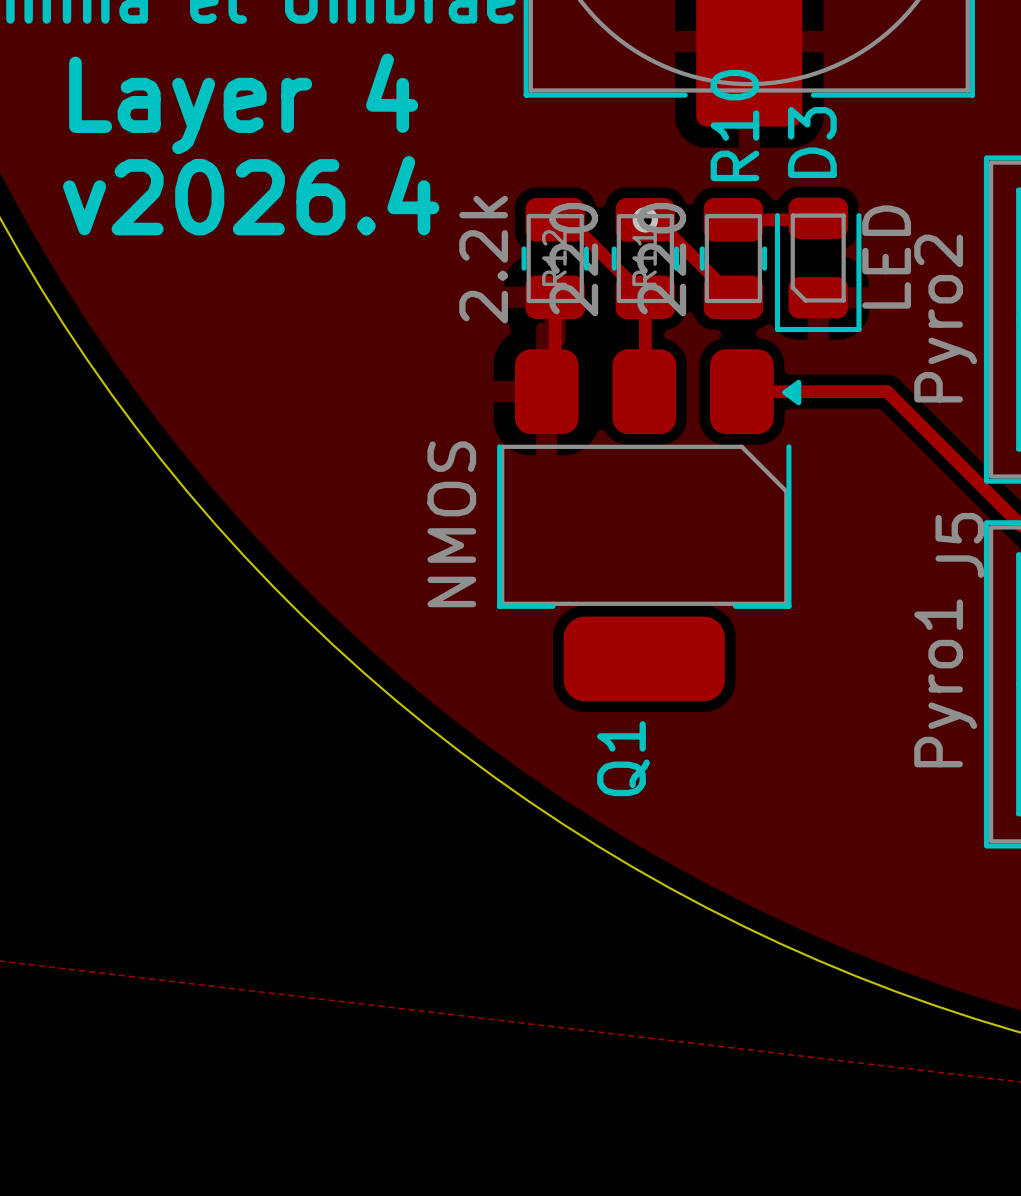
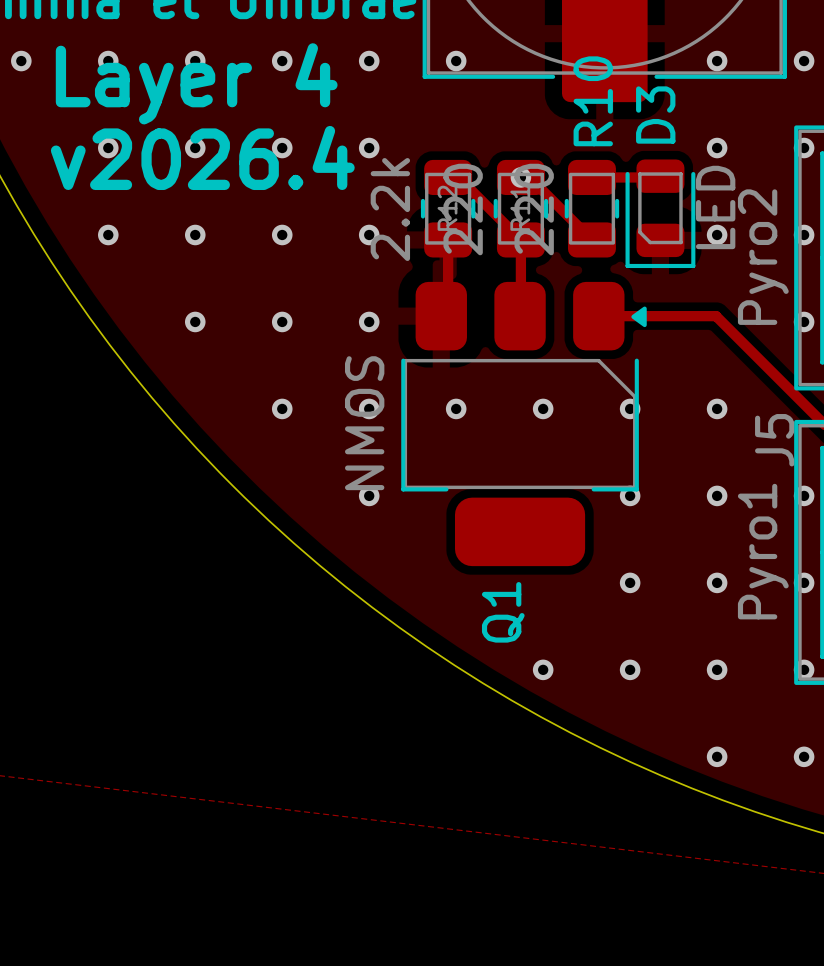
via: none -> (21, 61)
via: none -> (108, 61)
via: none -> (195, 61)
via: none -> (282, 61)
via: none -> (369, 61)
via: none -> (456, 61)
via: none -> (717, 61)
via: none -> (804, 61)
via: none -> (108, 148)
via: none -> (195, 148)
via: none -> (282, 148)
via: none -> (369, 148)
via: none -> (717, 148)
via: none -> (804, 148)
via: none -> (108, 234)
via: none -> (195, 234)
via: none -> (282, 234)
via: none -> (369, 234)
via: none -> (717, 234)
via: none -> (804, 234)
via: none -> (195, 321)
via: none -> (282, 321)
via: none -> (369, 321)
via: none -> (804, 321)
via: none -> (282, 408)
via: none -> (369, 408)
via: none -> (456, 408)
via: none -> (543, 408)
via: none -> (630, 408)
via: none -> (717, 408)
via: none -> (369, 495)
via: none -> (630, 495)
via: none -> (717, 495)
via: none -> (804, 495)
via: none -> (630, 582)
via: none -> (717, 582)
via: none -> (804, 582)
via: none -> (543, 669)
via: none -> (630, 669)
via: none -> (717, 669)
via: none -> (804, 669)
via: none -> (717, 756)
via: none -> (804, 756)

